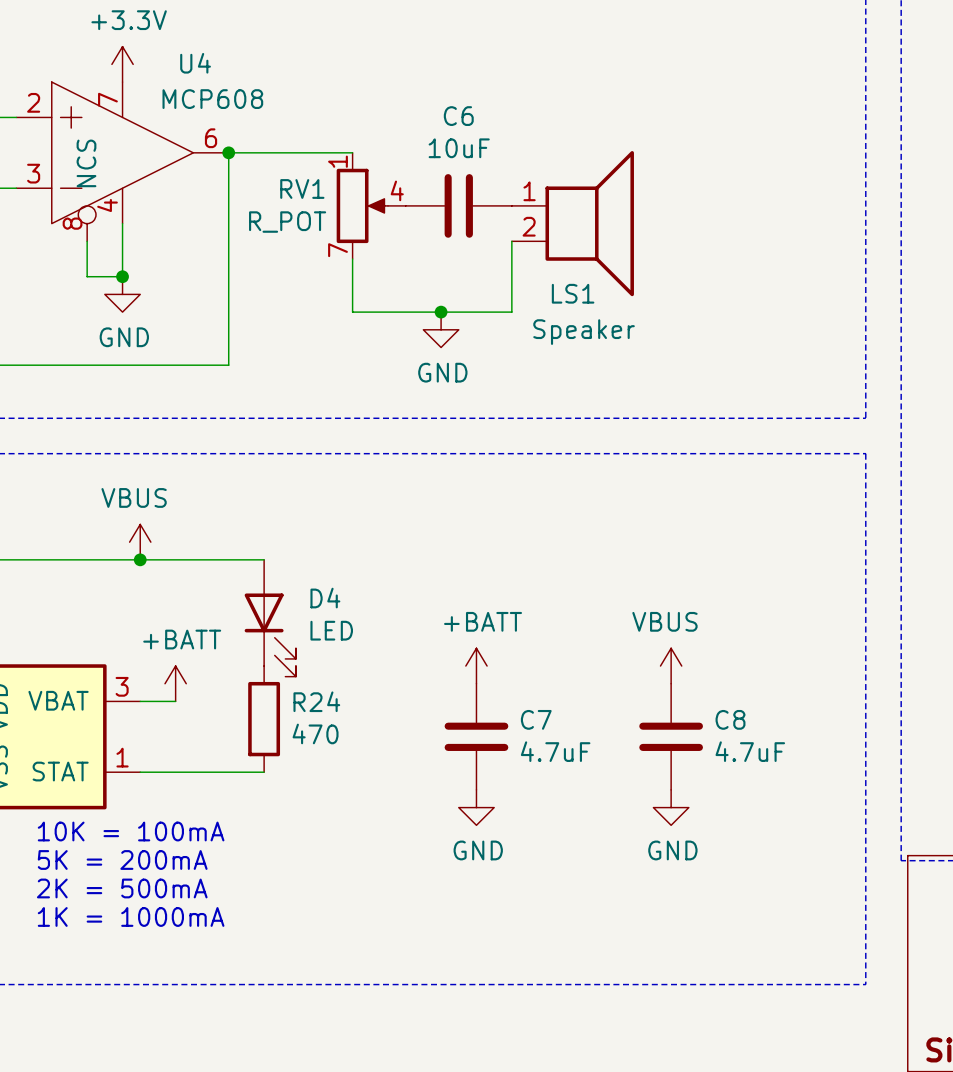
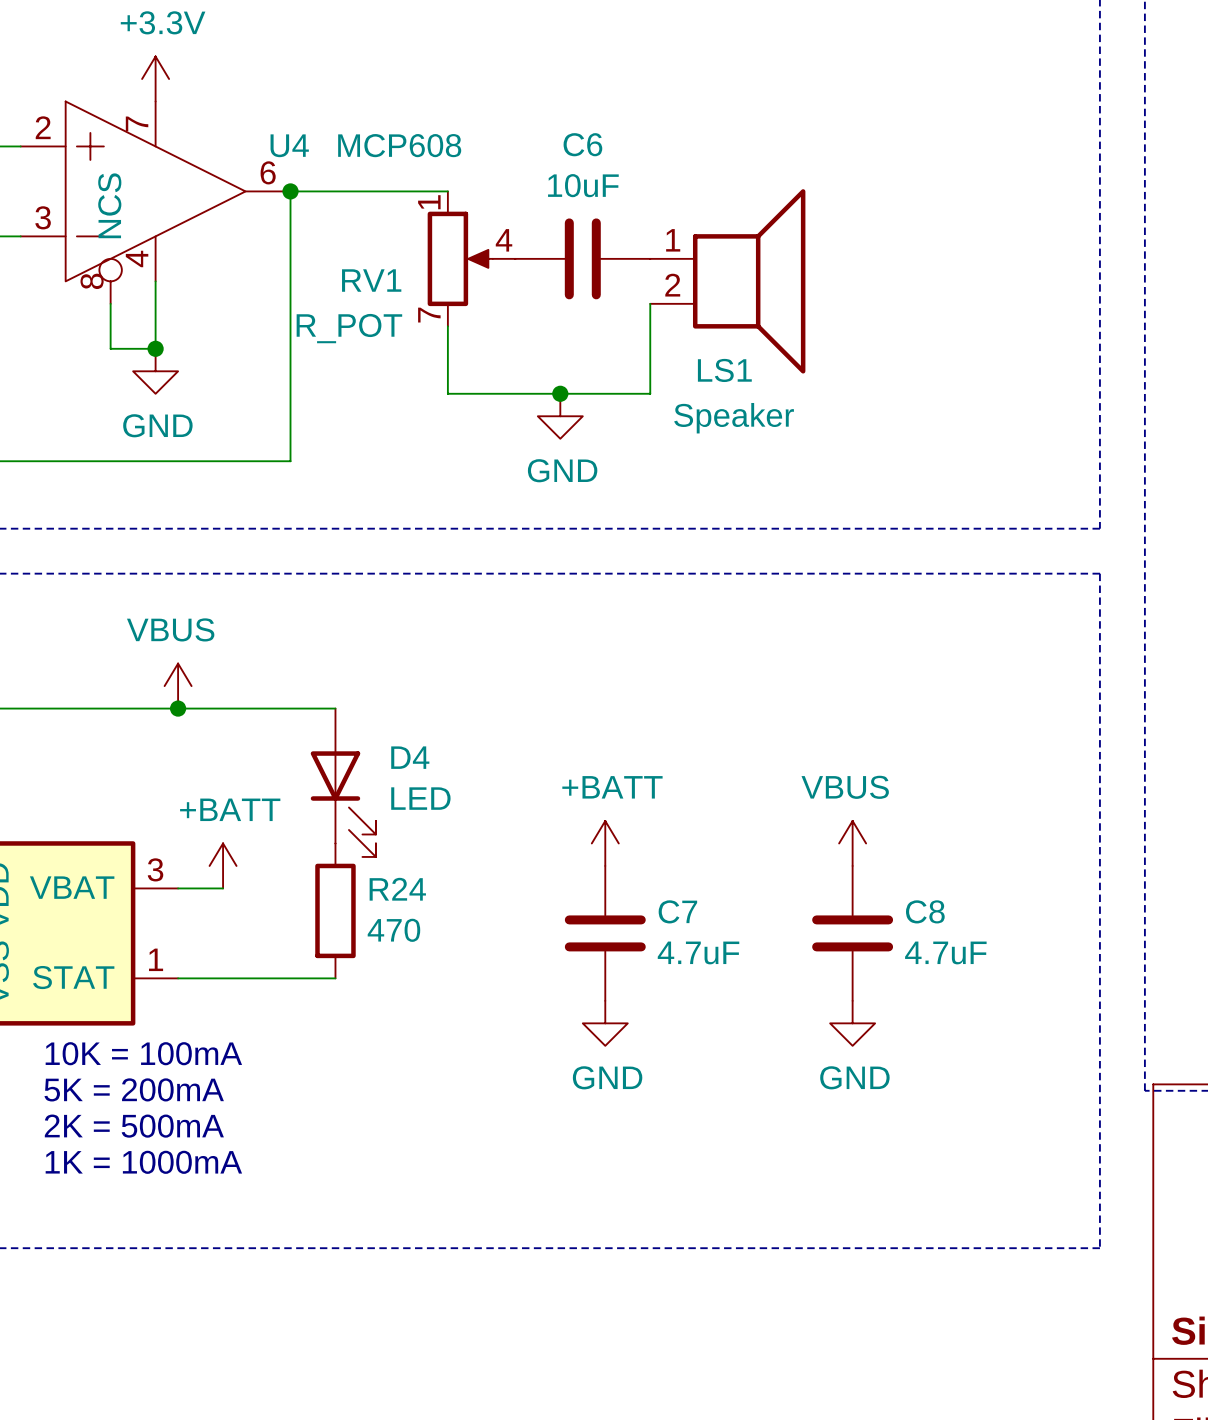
U4 name position: U4 (195, 63) -> U4 (289, 145)
U4 value position: MCP608 (212, 99) -> MCP608 (399, 145)
RV1 name position: RV1 (302, 188) -> RV1 (371, 280)
RV1 value position: R_POT (287, 222) -> R_POT (349, 328)

